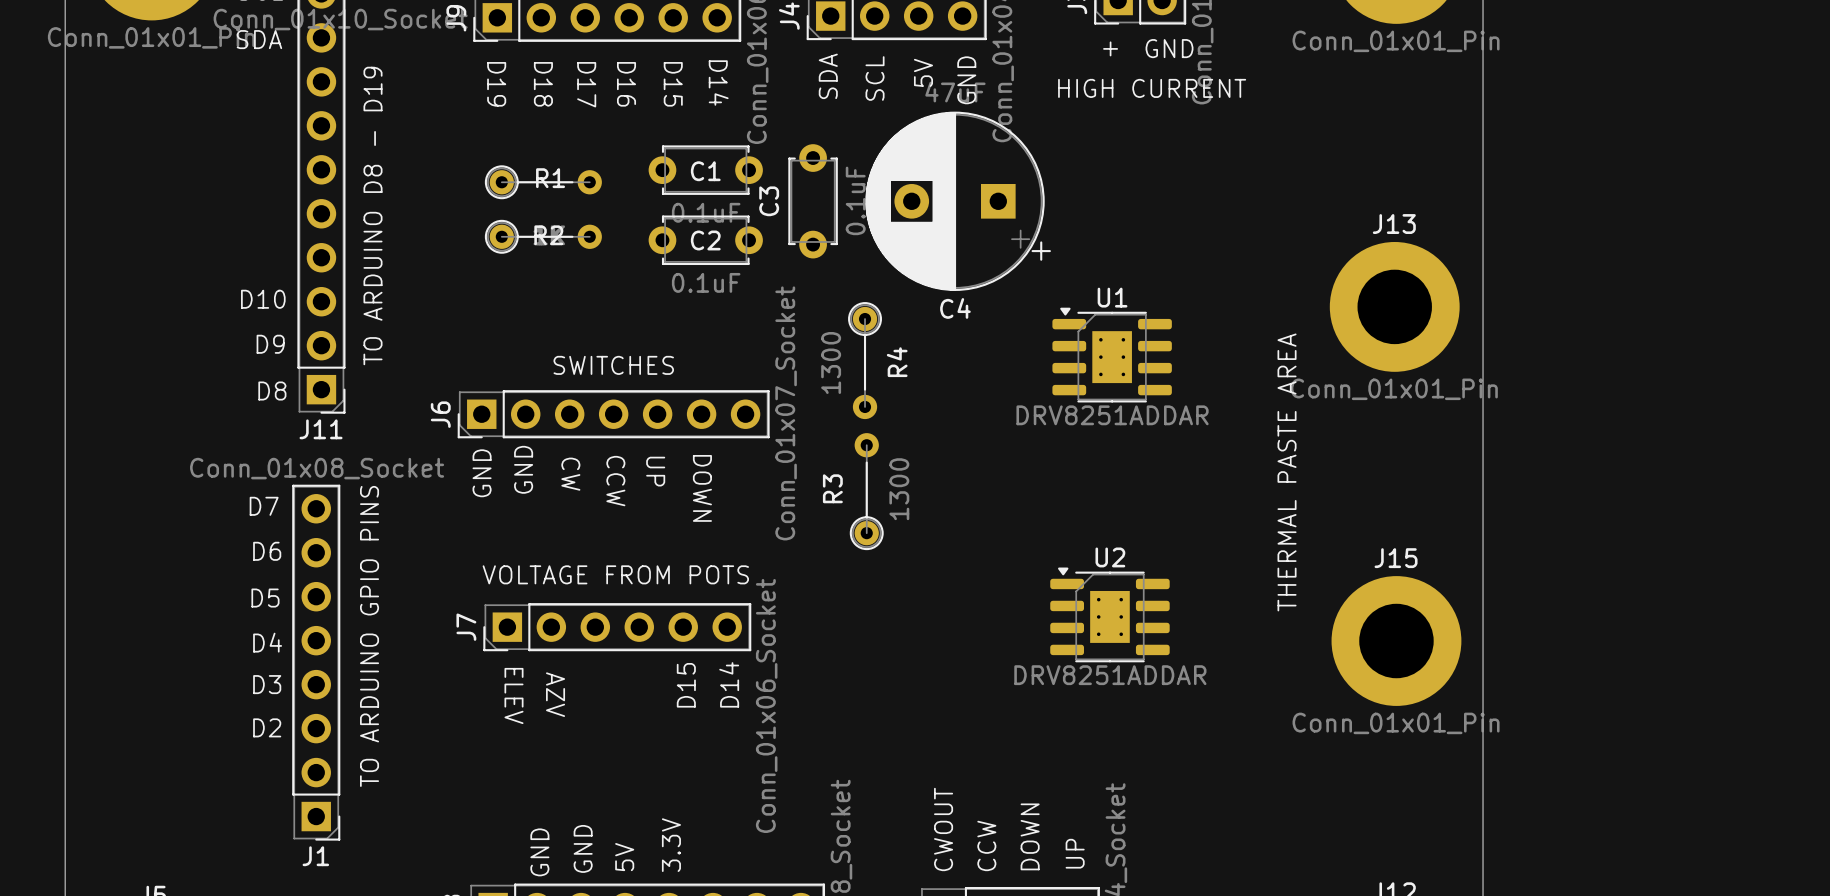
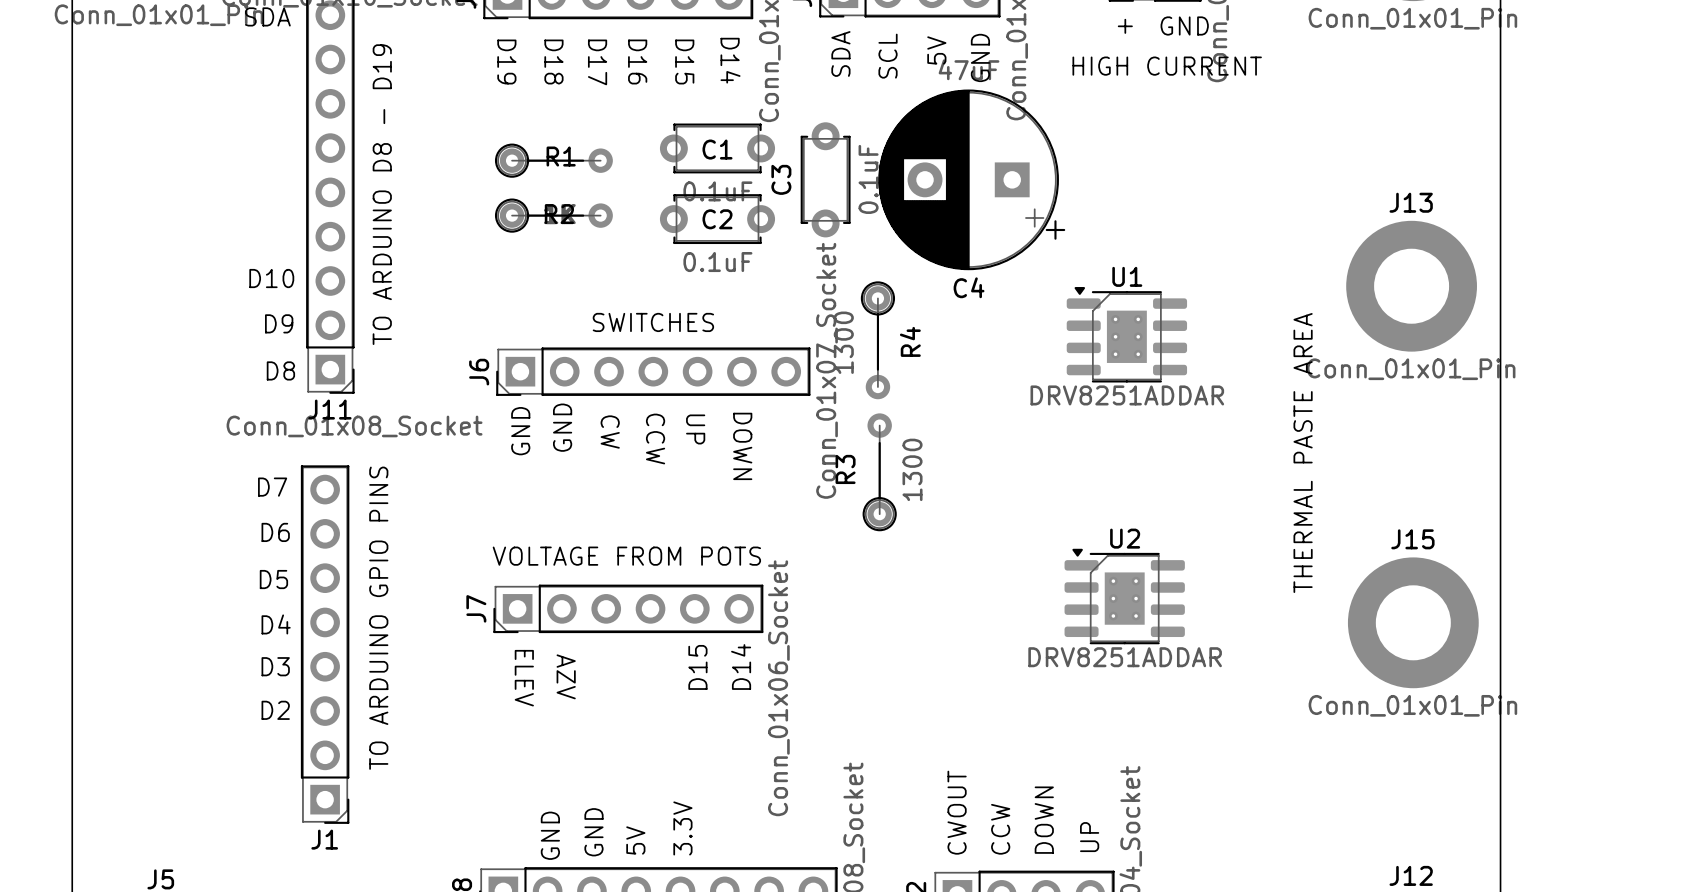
text position: SWITCHES (613, 365) -> SWITCHES (653, 322)
J6 position: (613, 414) -> (653, 371)
text: none -> GND (562, 427)
text: none -> GND (520, 431)
J1 value position: Conn_01x08_Socket (317, 468) -> Conn_01x08_Socket (354, 426)
text: GND (523, 469) -> none
text position: UP (655, 471) -> UP (695, 429)
text: GND (482, 473) -> none
text position: CW (570, 474) -> CW (610, 432)
text position: CCW (615, 481) -> CCW (655, 439)
text position: DOWN (702, 488) -> DOWN (742, 446)

